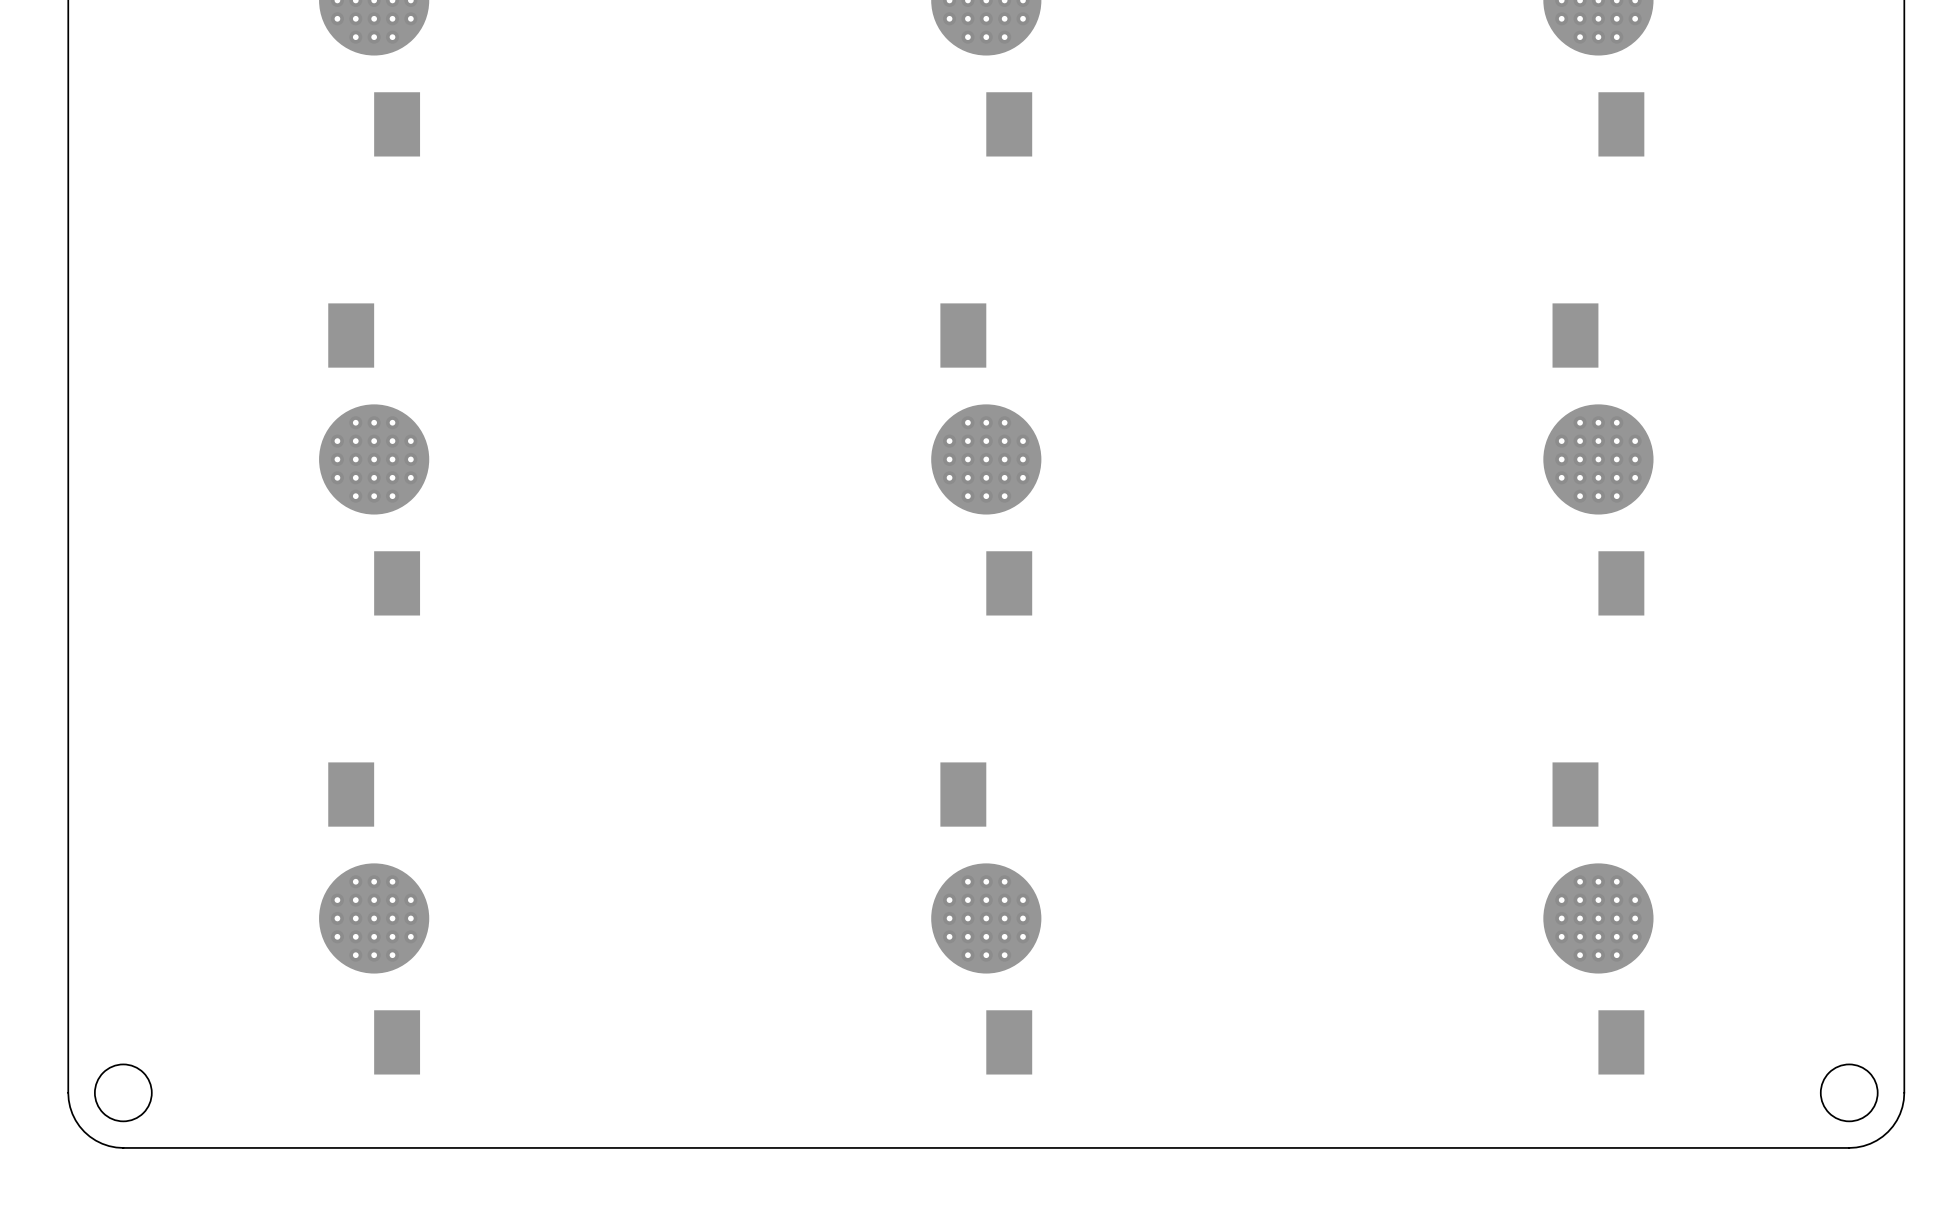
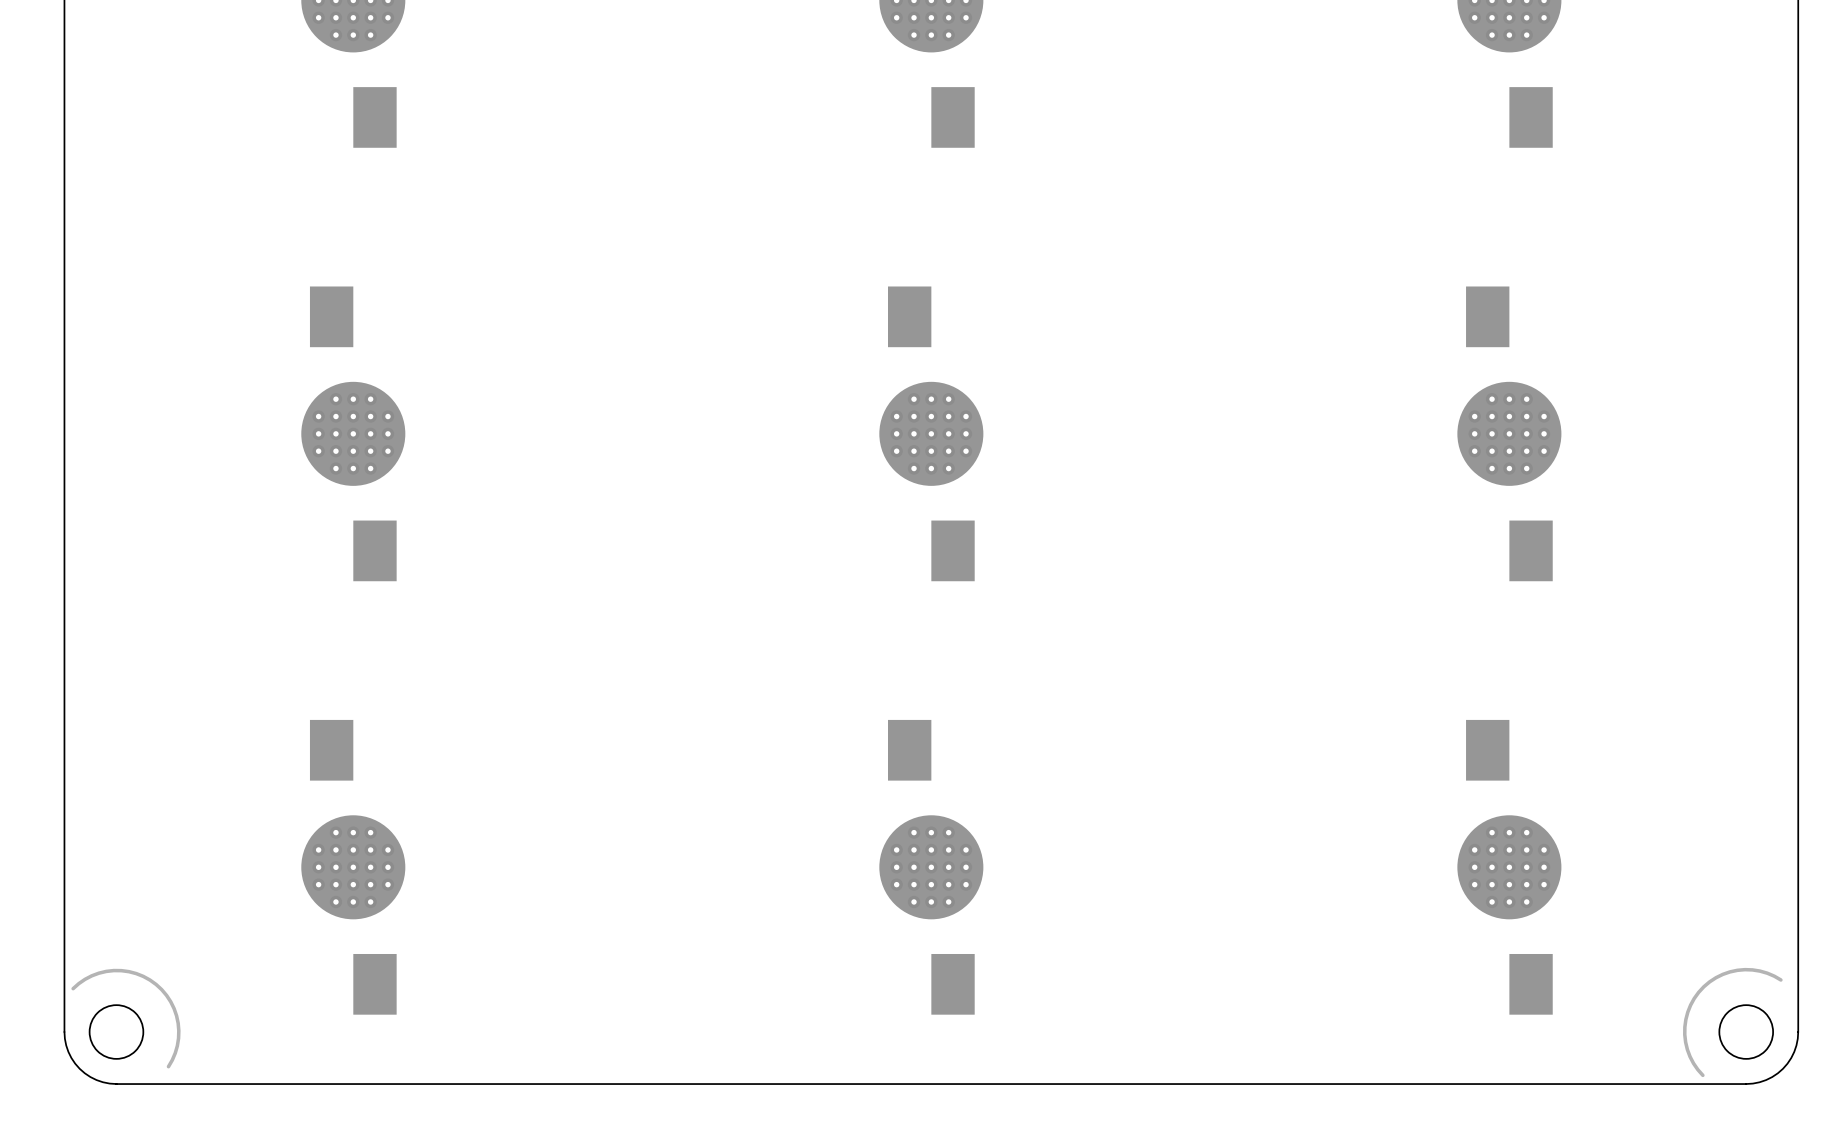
track: none -> (1780, 980) (1760, 971) (1737, 970) (1716, 977) (1698, 992) (1687, 1012) (1684, 1034) (1690, 1056) (1702, 1075)
track: none -> (73, 988) (91, 975) (113, 970) (136, 973) (156, 984) (170, 1001) (178, 1023) (177, 1045) (168, 1066)

